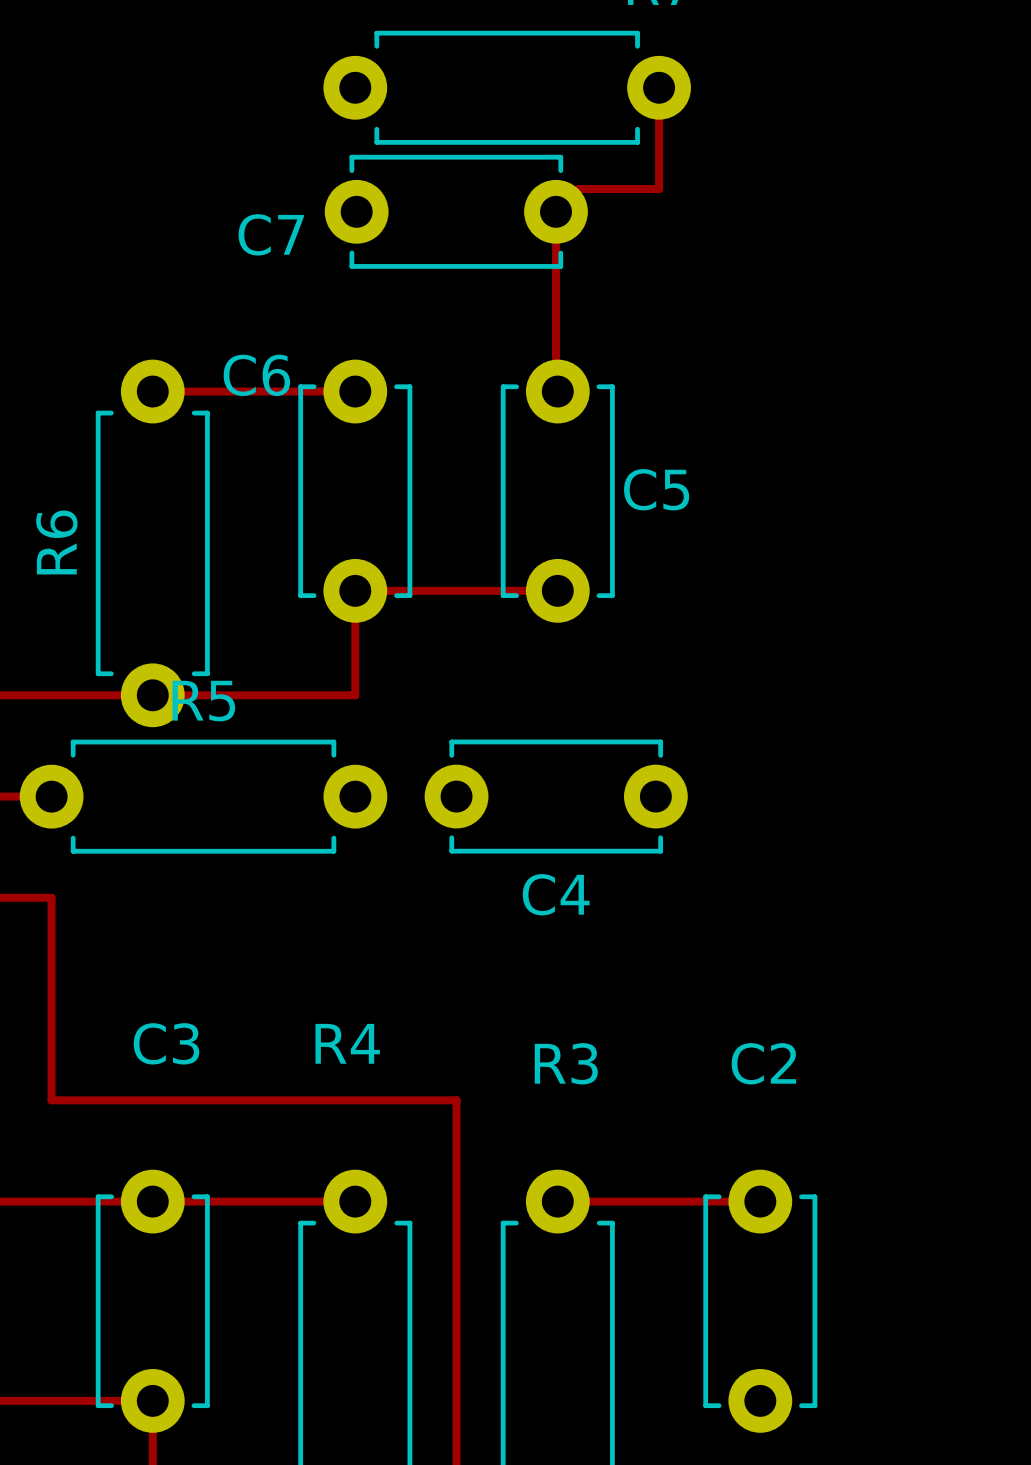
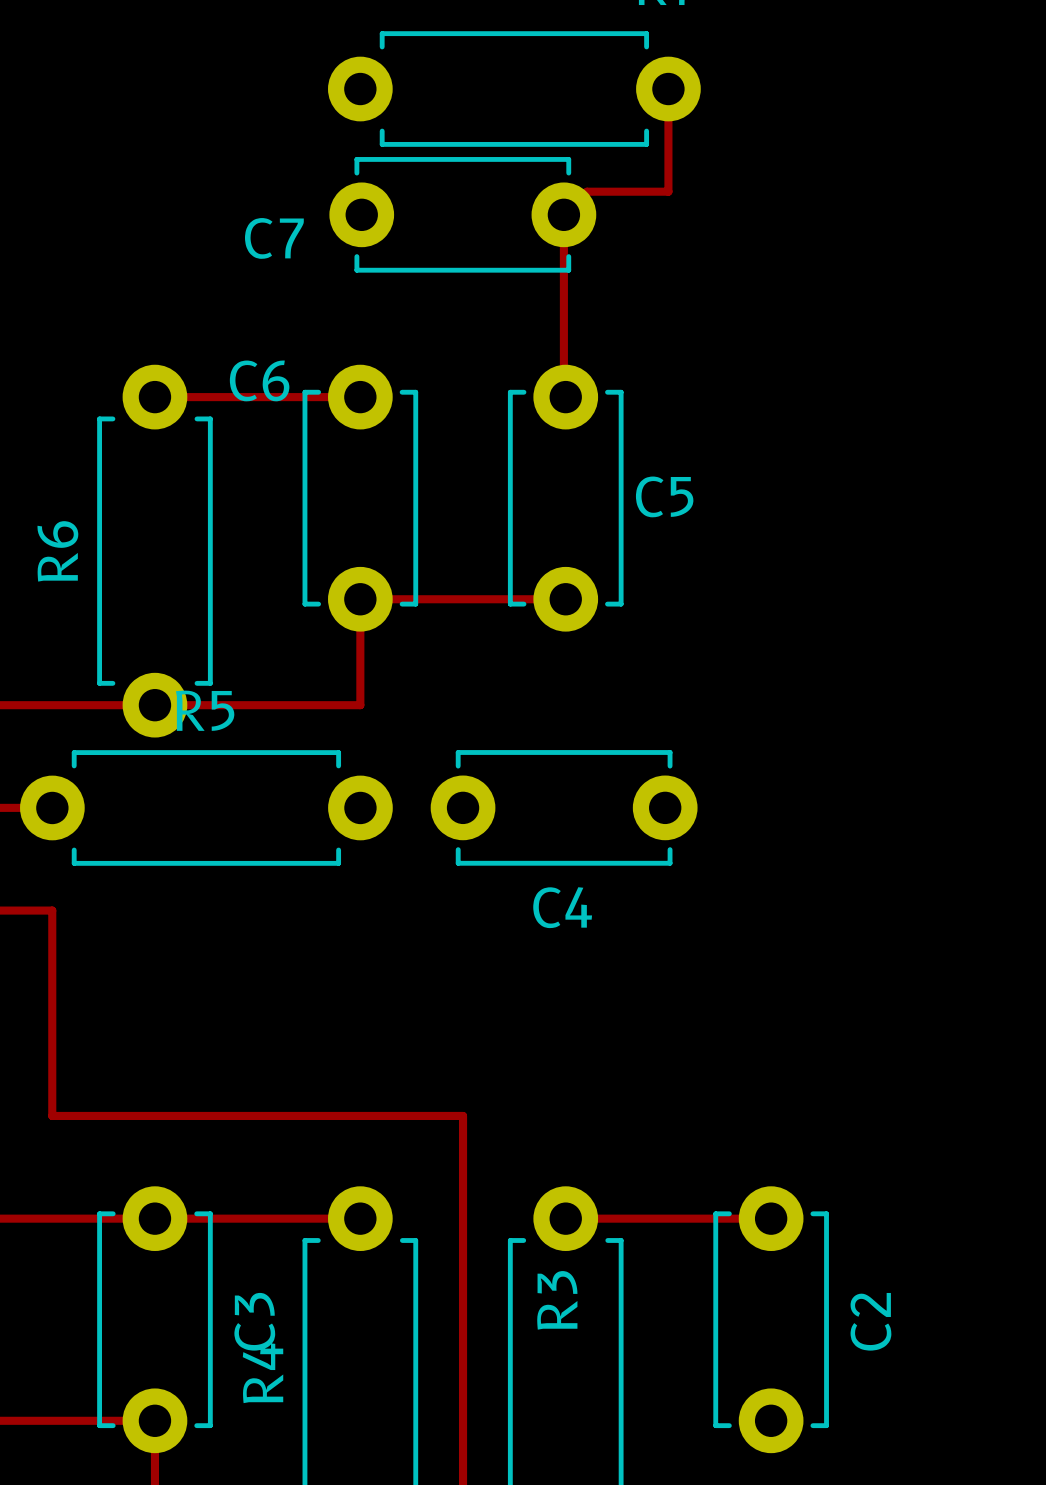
C3 name rotation: 0° (166, 1043) -> 90° counterclockwise (254, 1321)
C3 name position: C3 (166, 1043) -> C3 (254, 1321)
R4 name rotation: 0° (347, 1043) -> 90° counterclockwise (263, 1373)
R4 name position: R4 (347, 1043) -> R4 (263, 1373)
R3 name rotation: 0° (566, 1063) -> 90° counterclockwise (557, 1300)
R3 name position: R3 (566, 1063) -> R3 (557, 1300)
C2 name rotation: 0° (763, 1063) -> 90° counterclockwise (870, 1321)
C2 name position: C2 (763, 1063) -> C2 (870, 1321)

